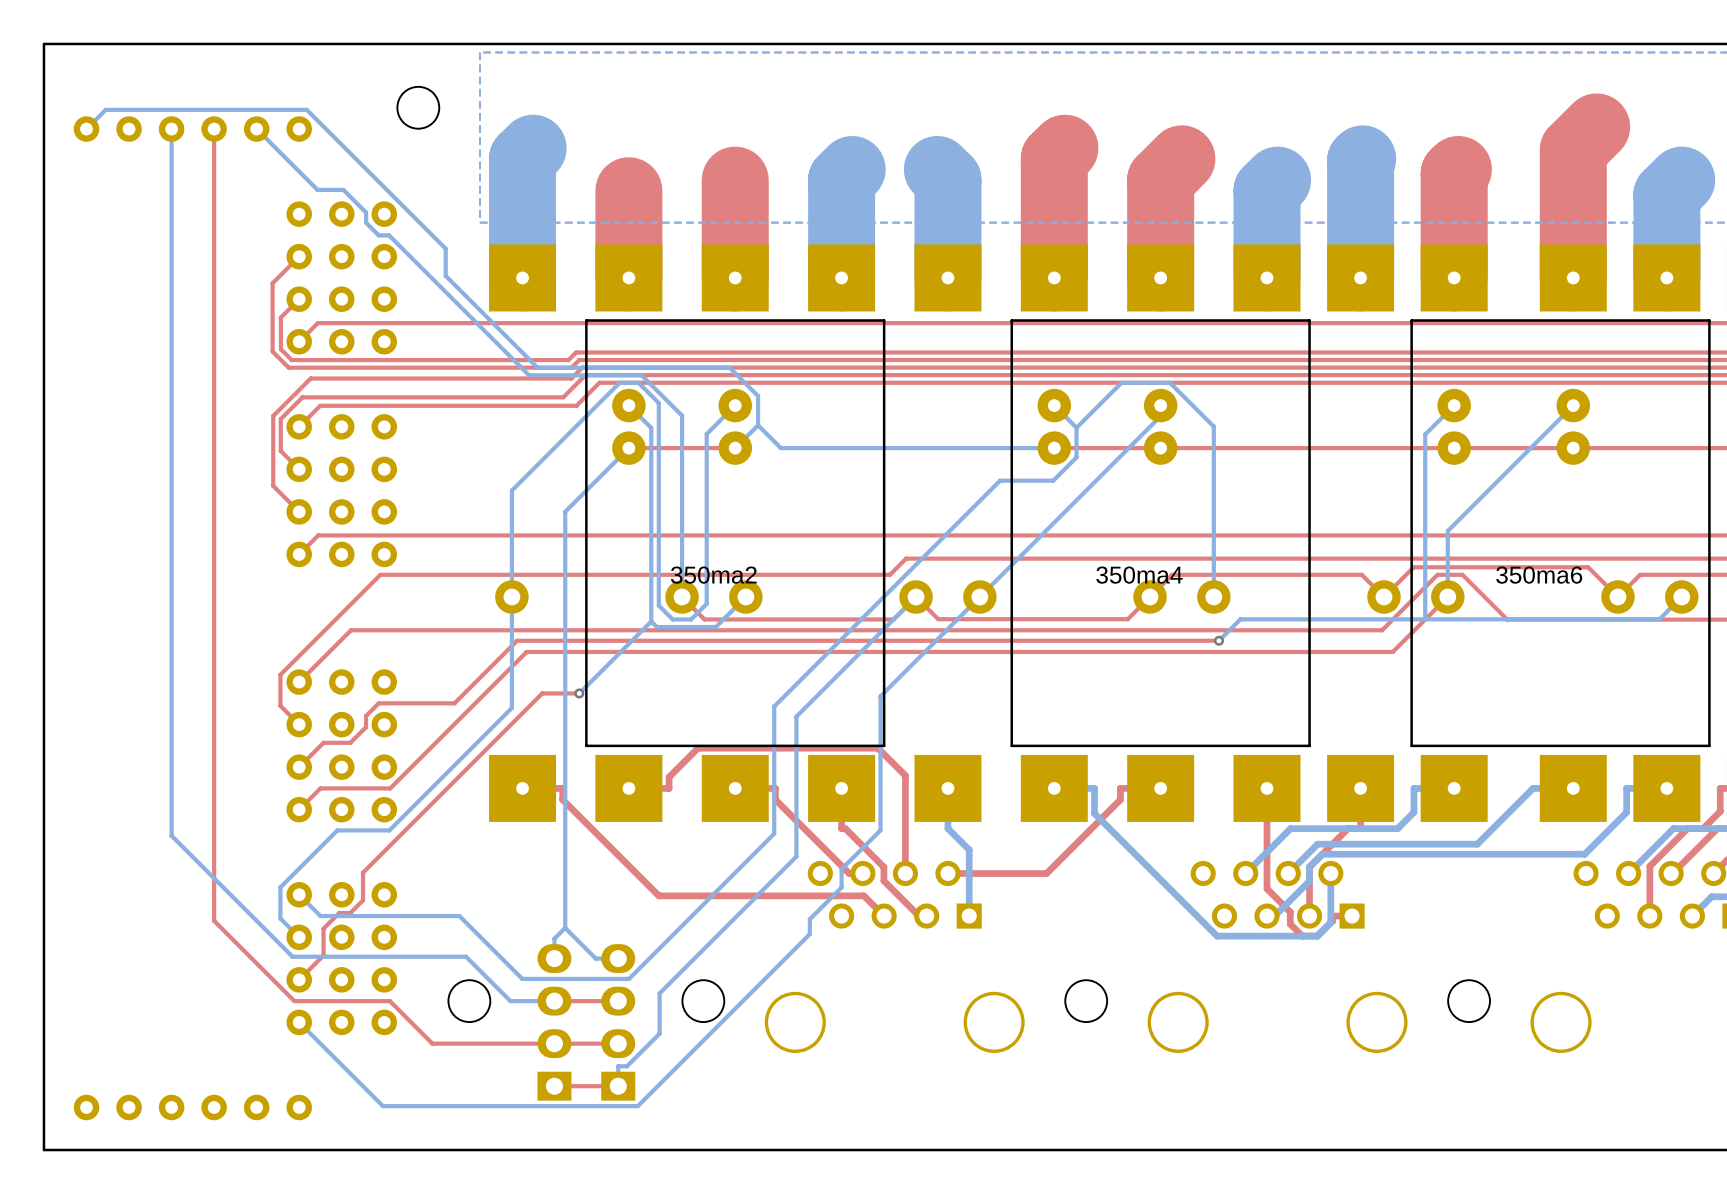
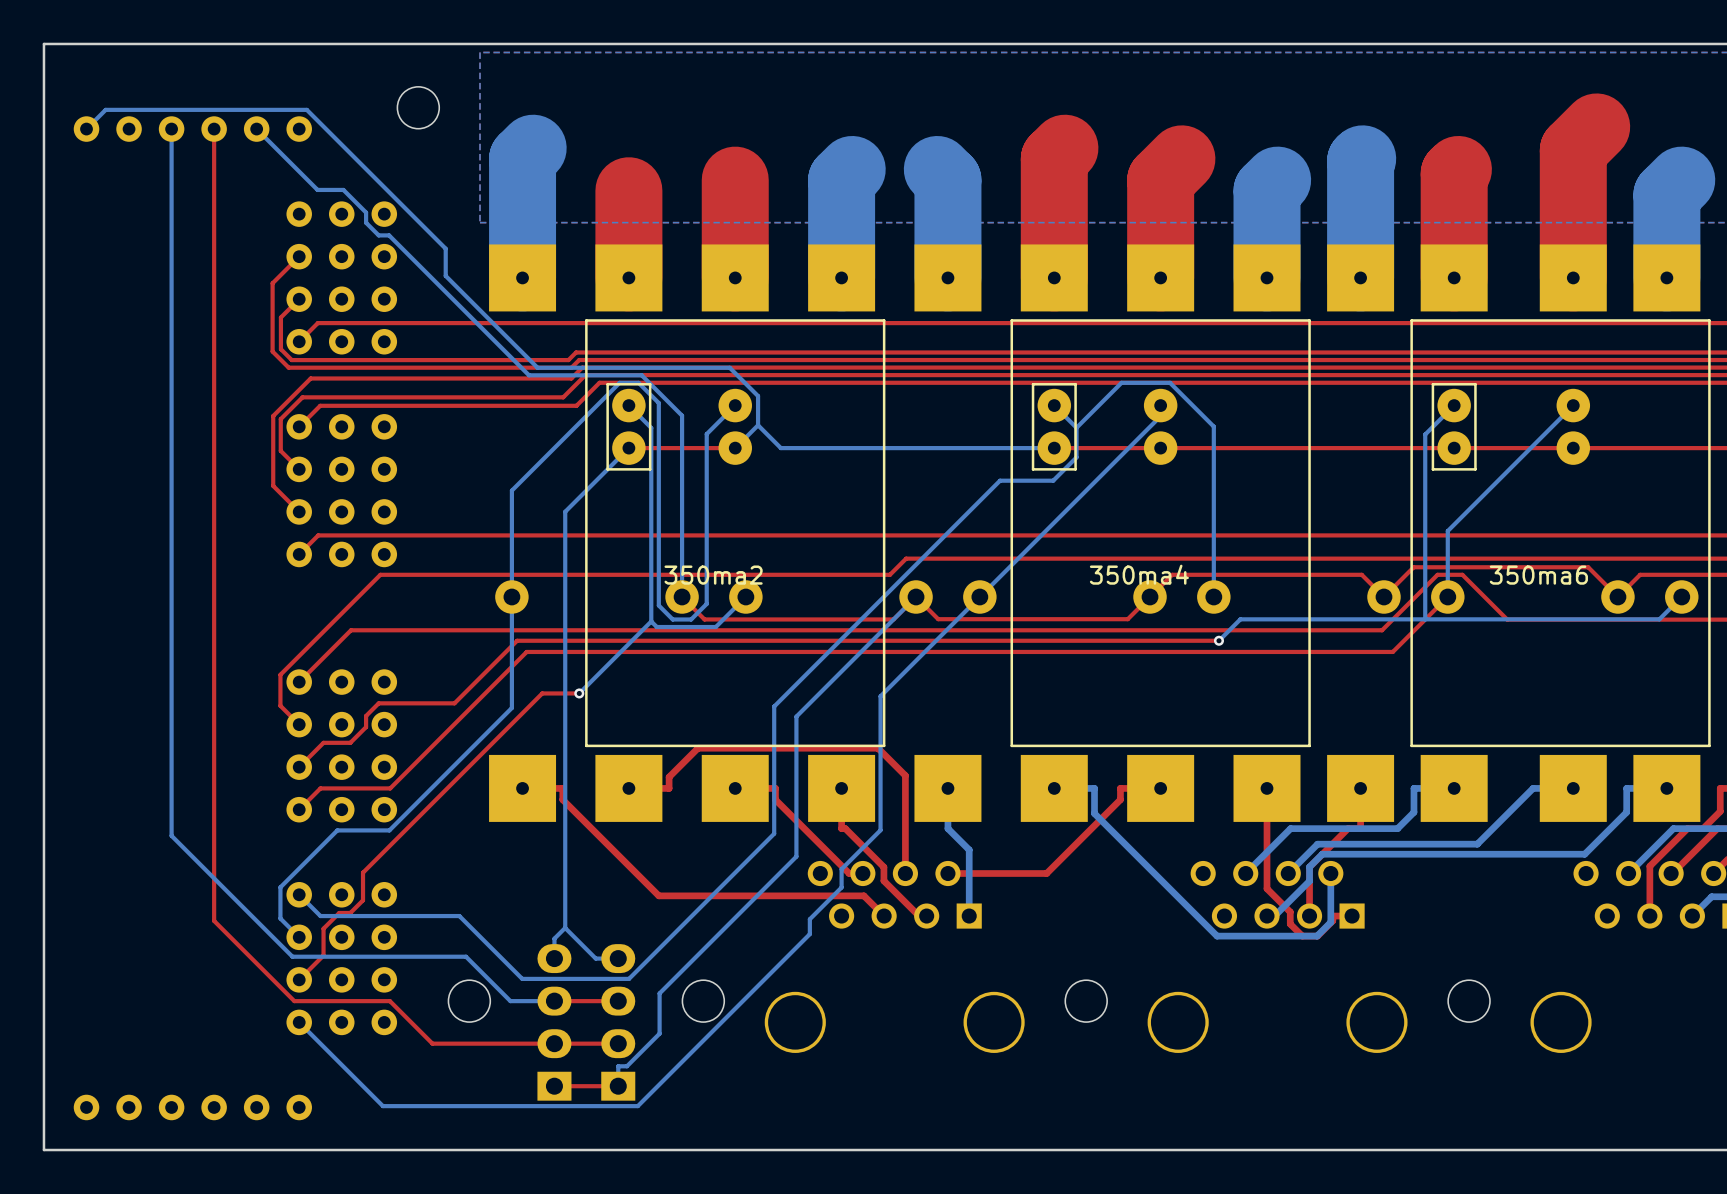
350ma2 footprint: [585, 244, 886, 822] -> [585, 244, 886, 822]
350ma4 footprint: [1010, 244, 1311, 822] -> [1010, 244, 1311, 822]
350ma6 footprint: [1410, 244, 1711, 822] -> [1410, 244, 1711, 822]

